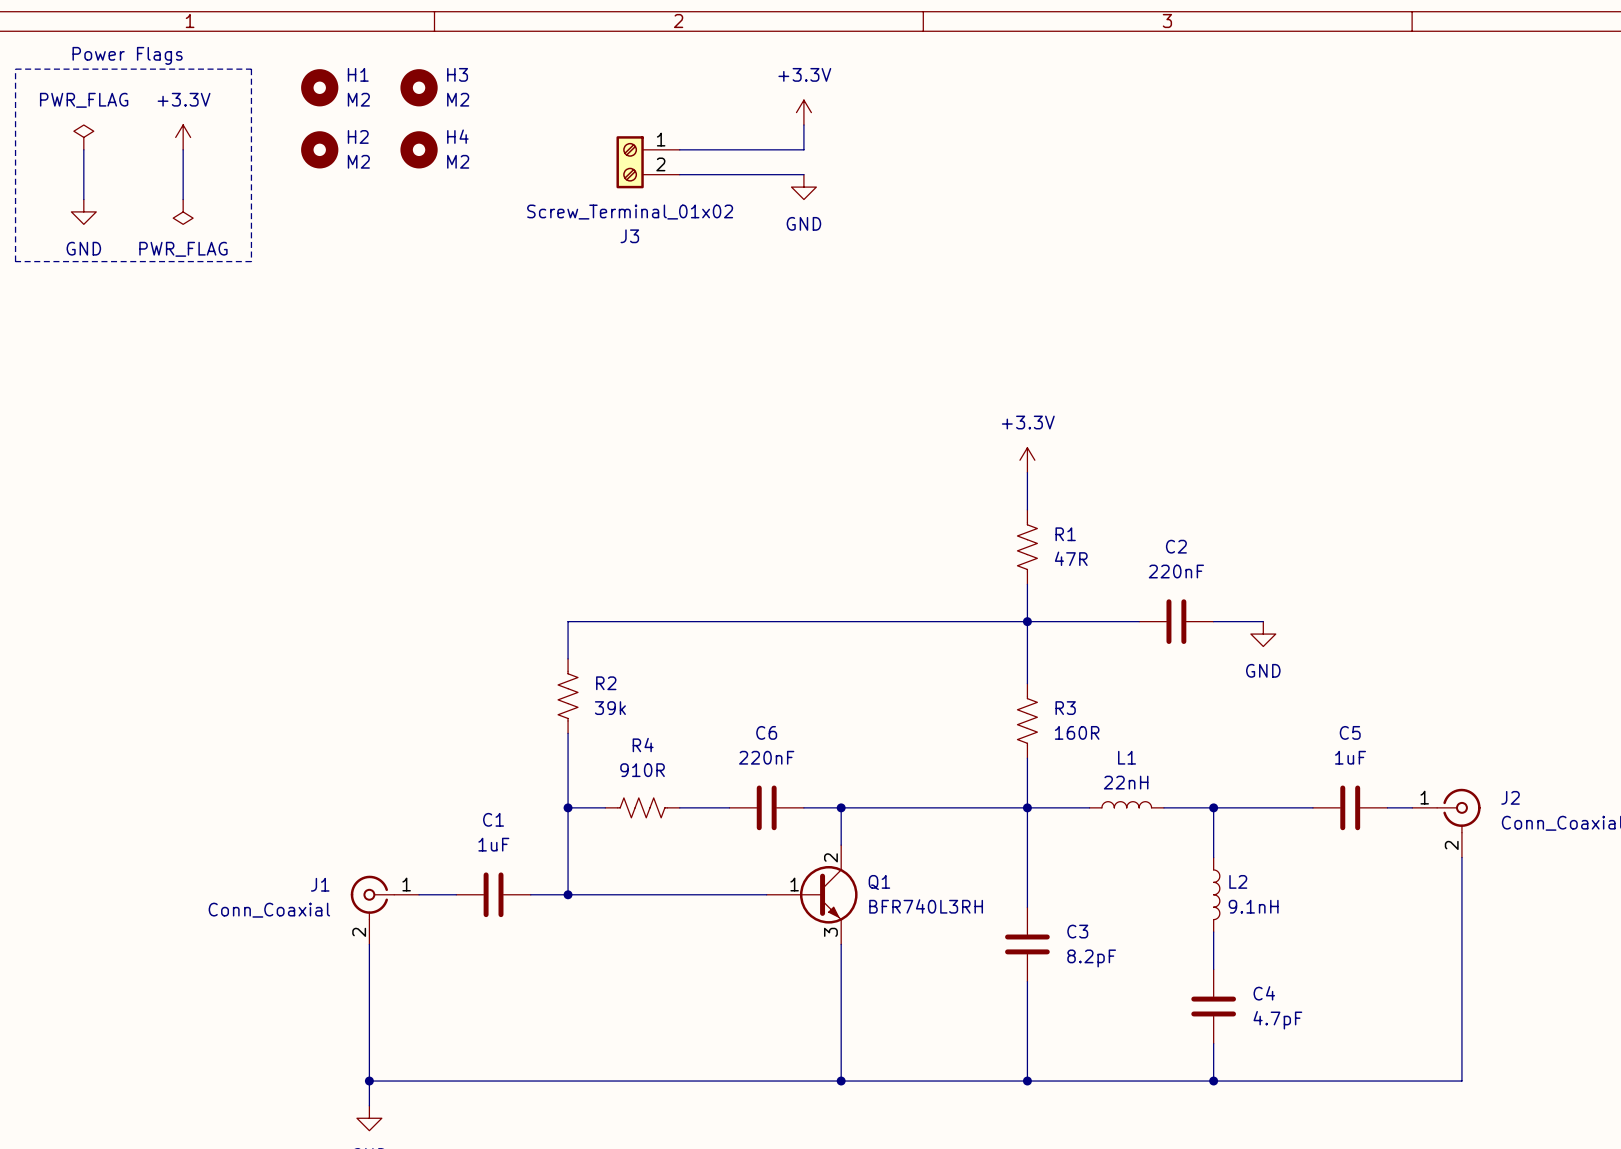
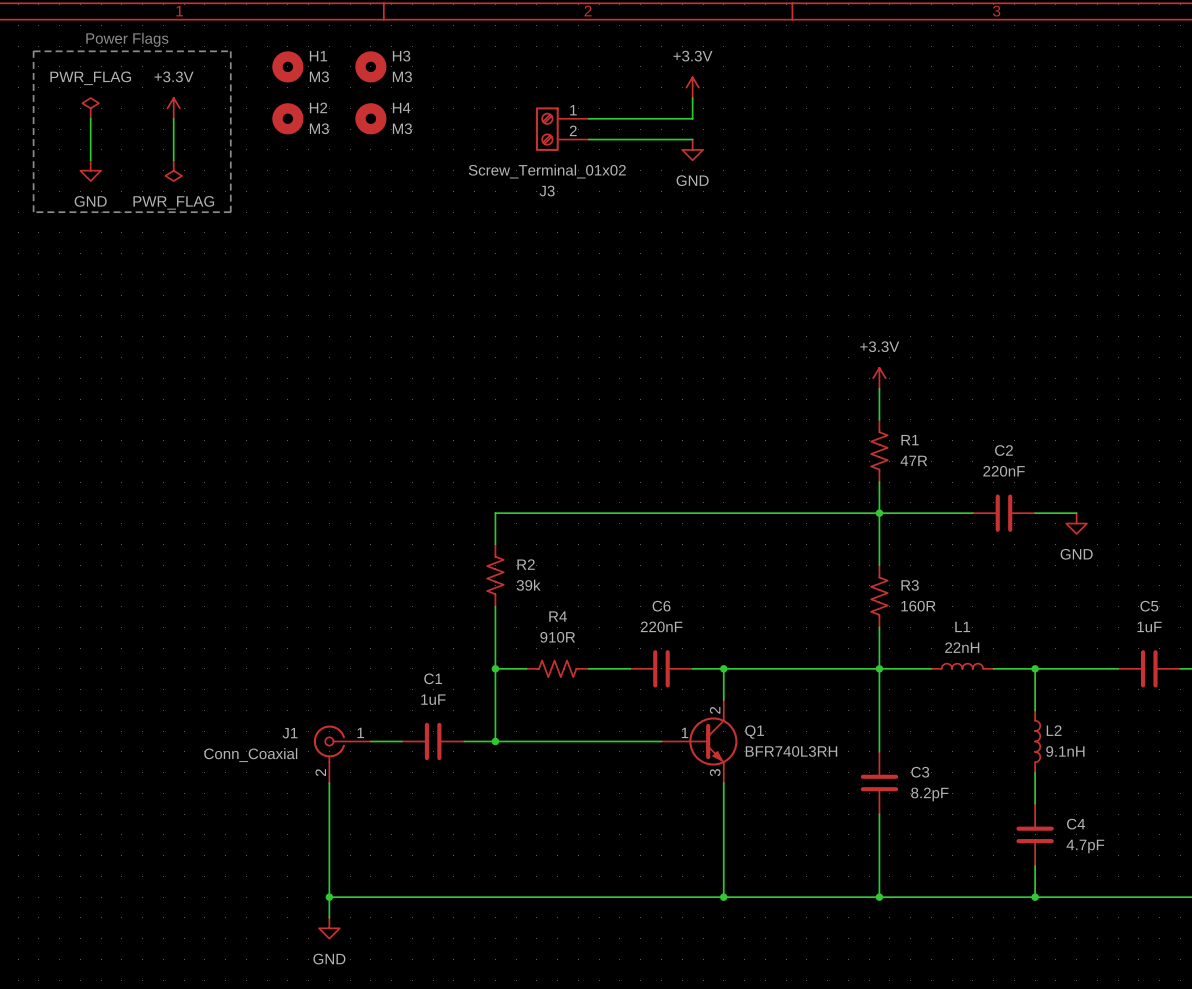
H1 value: M2 (358, 99) -> M3 (319, 76)
H3 value: M2 (458, 99) -> M3 (402, 76)
H2 value: M2 (358, 161) -> M3 (319, 128)
H4 value: M2 (458, 161) -> M3 (402, 128)

